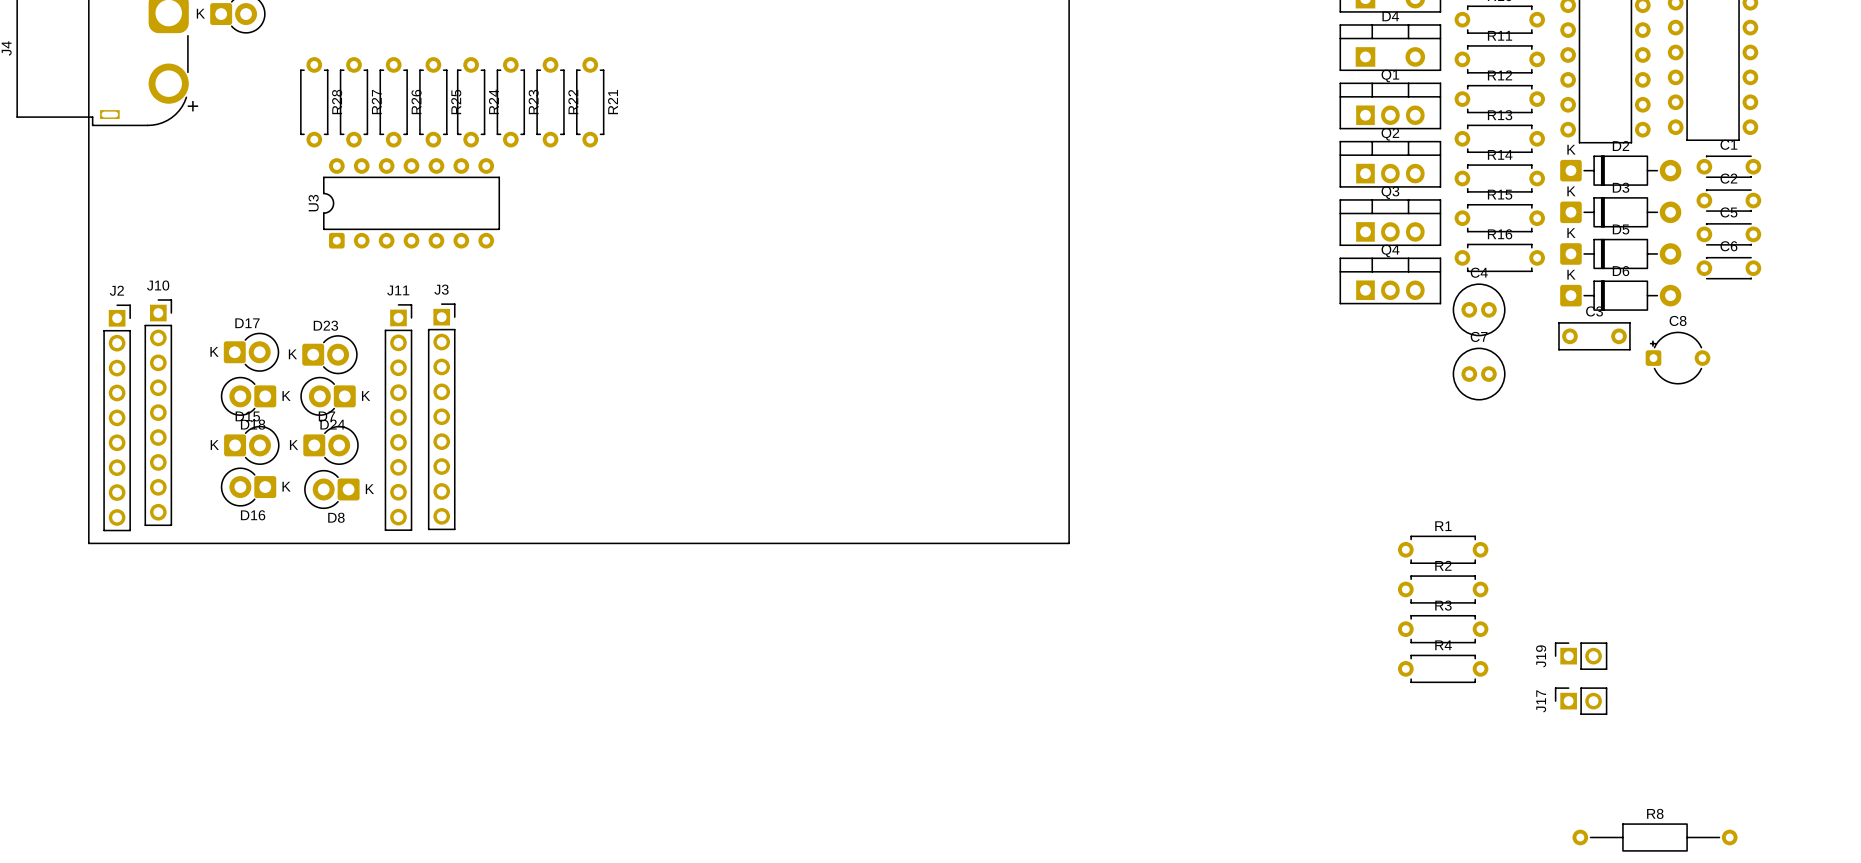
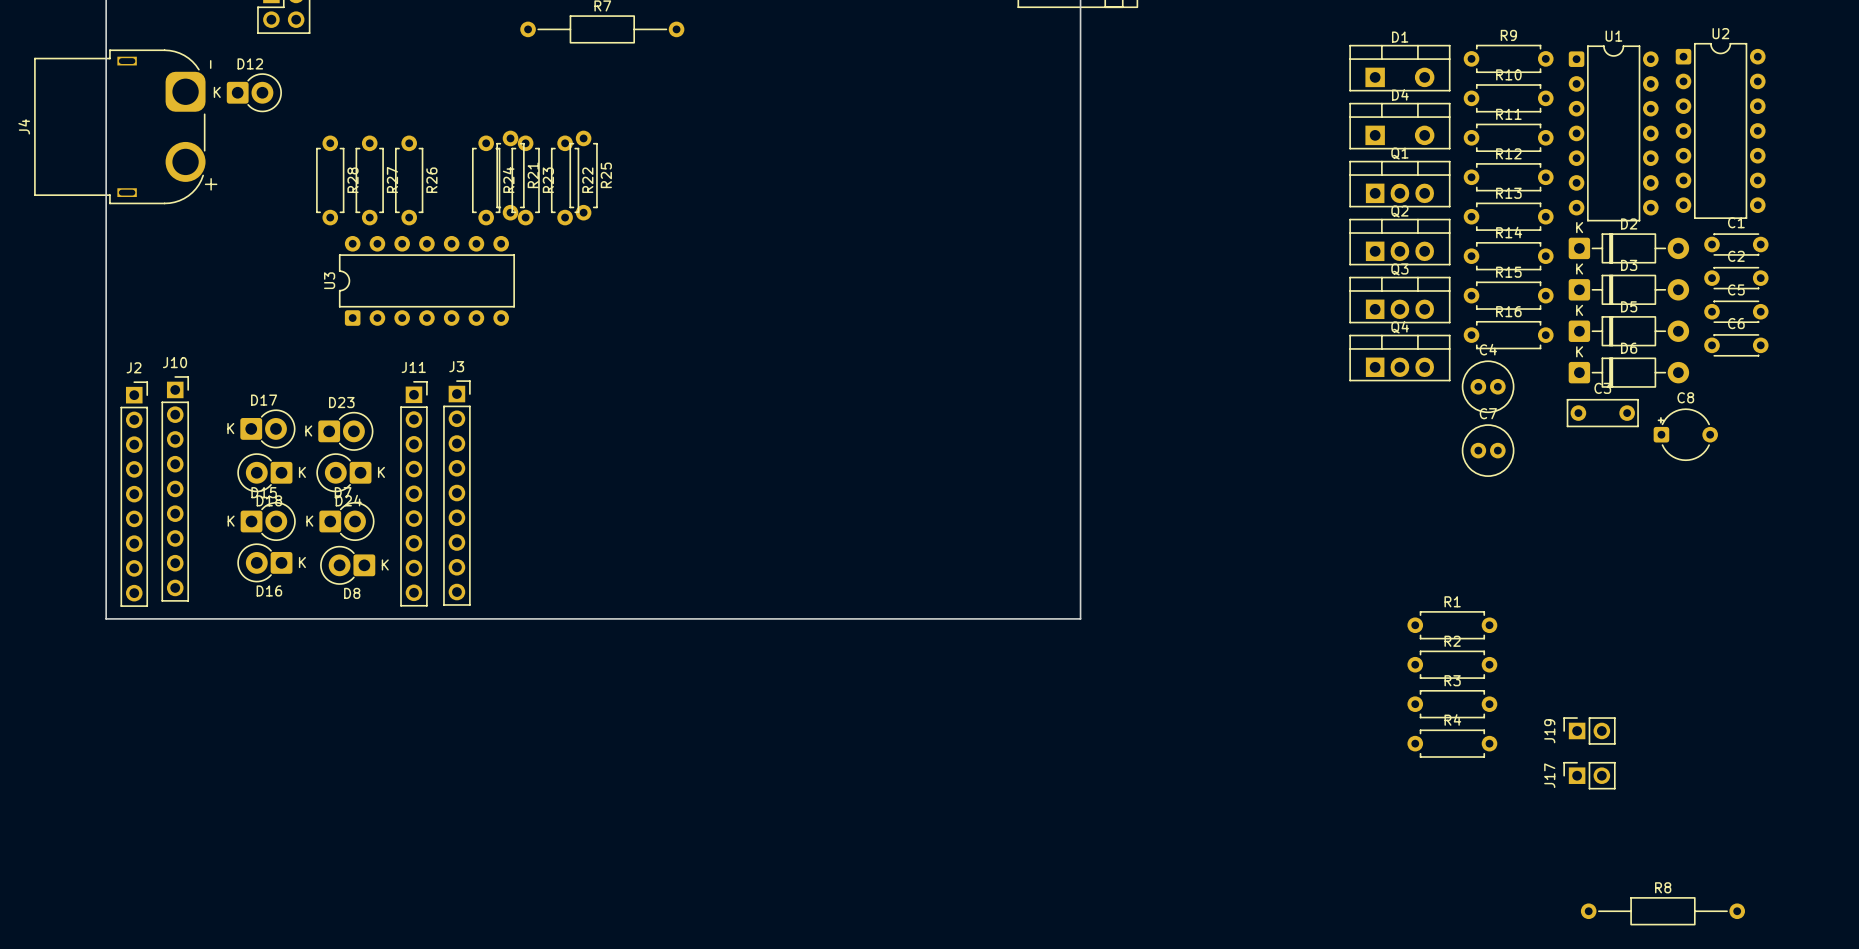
R25 position: (433, 102) -> (583, 175)
R21 position: (590, 102) -> (510, 175)

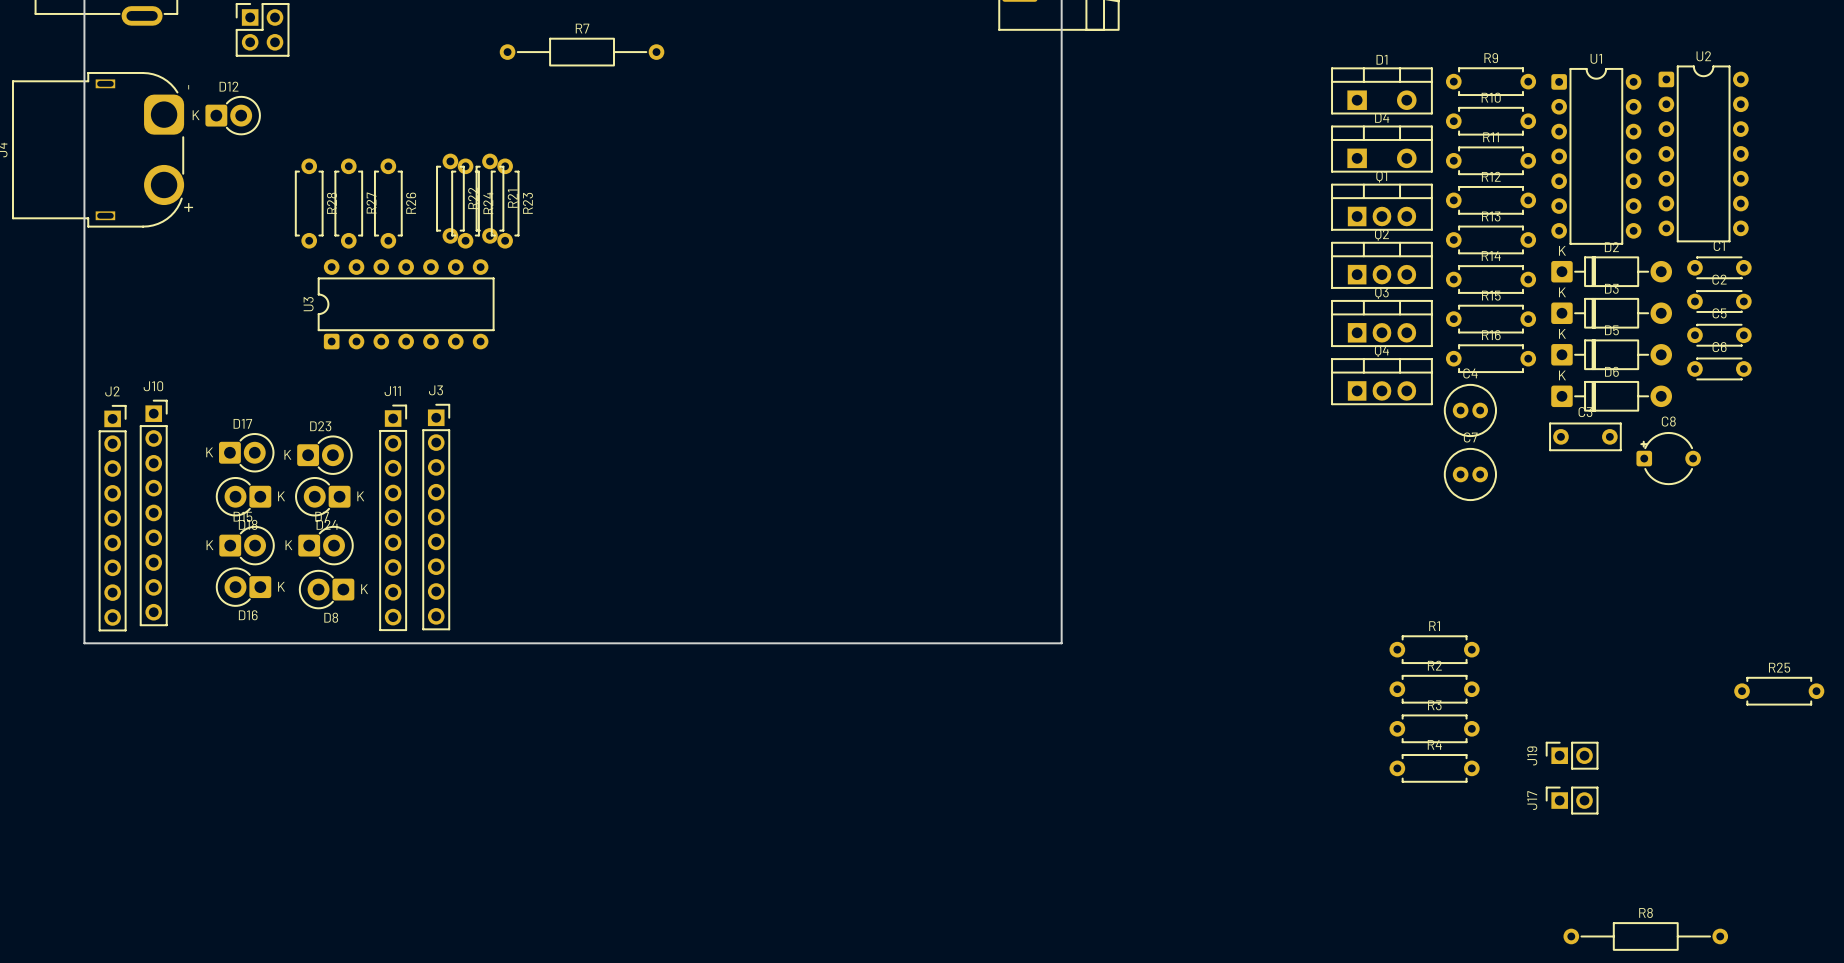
R25 rotation: 0° (583, 175) -> 90° clockwise (1779, 691)
R25 position: (583, 175) -> (1779, 691)
R25 name position: R25 (606, 175) -> R25 (1779, 667)
R22 position: (565, 180) -> (450, 198)

